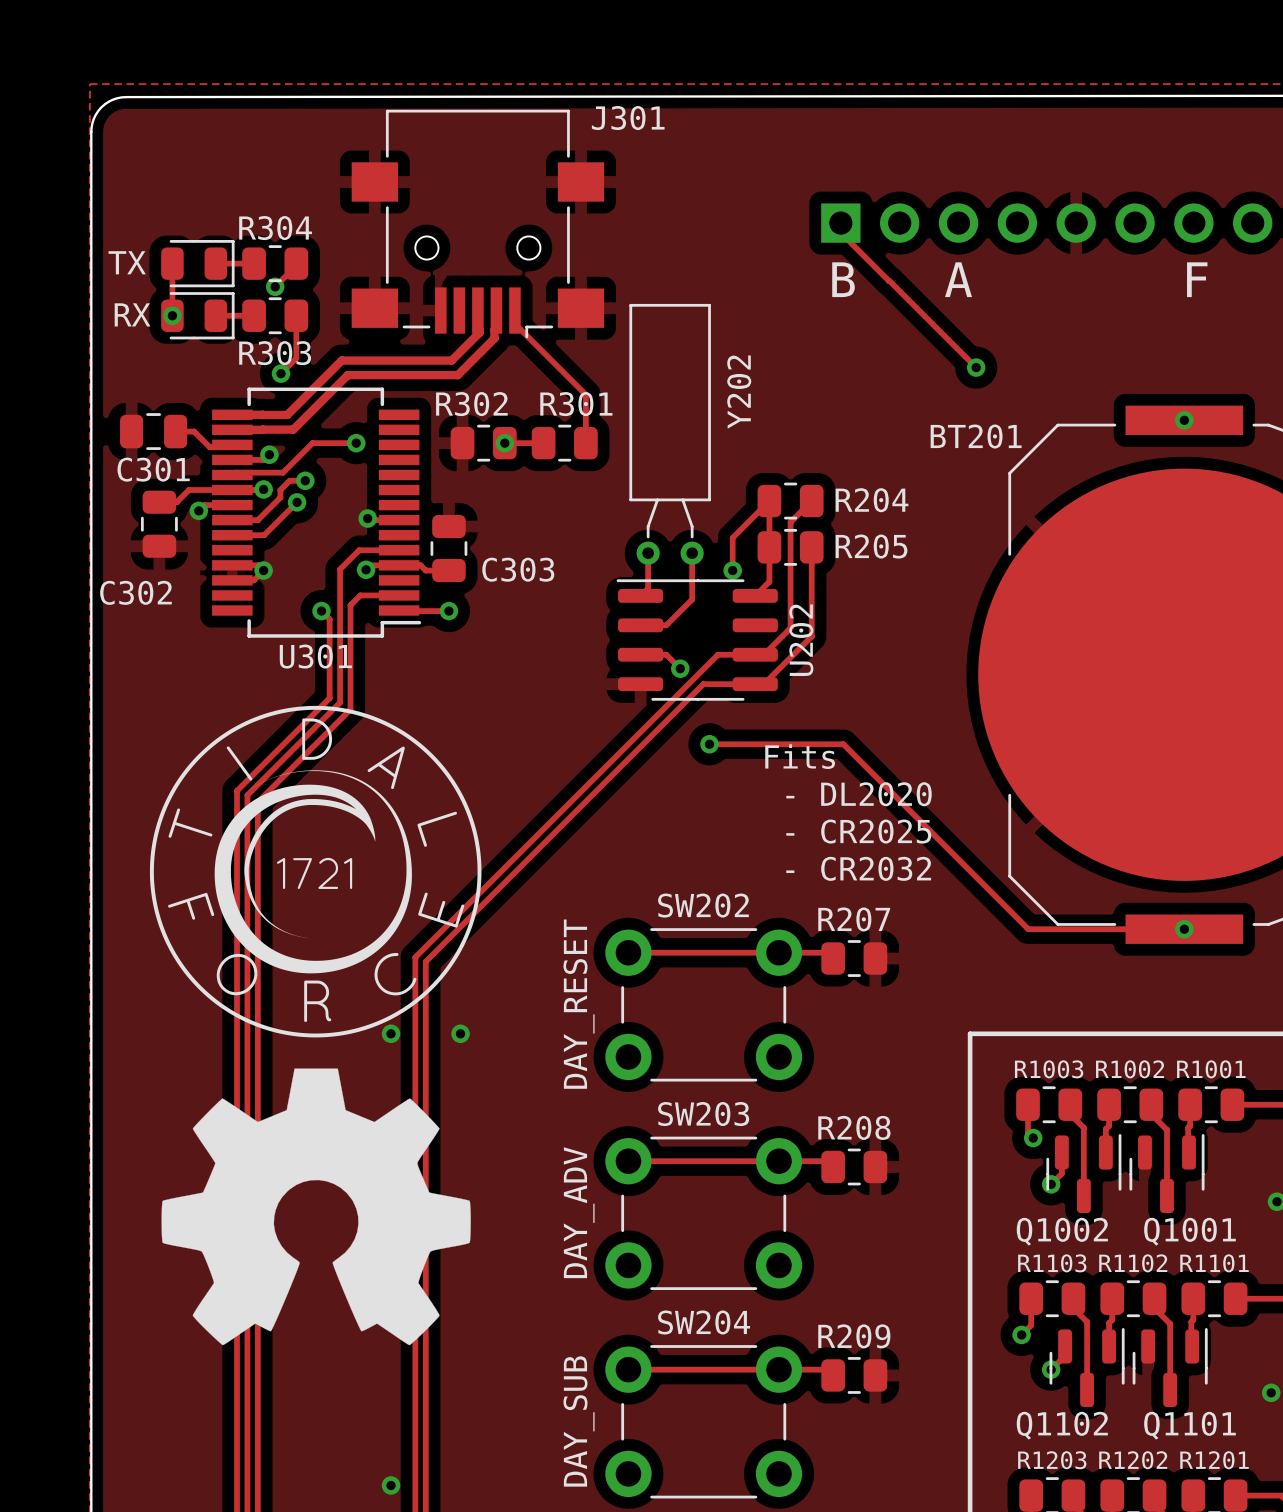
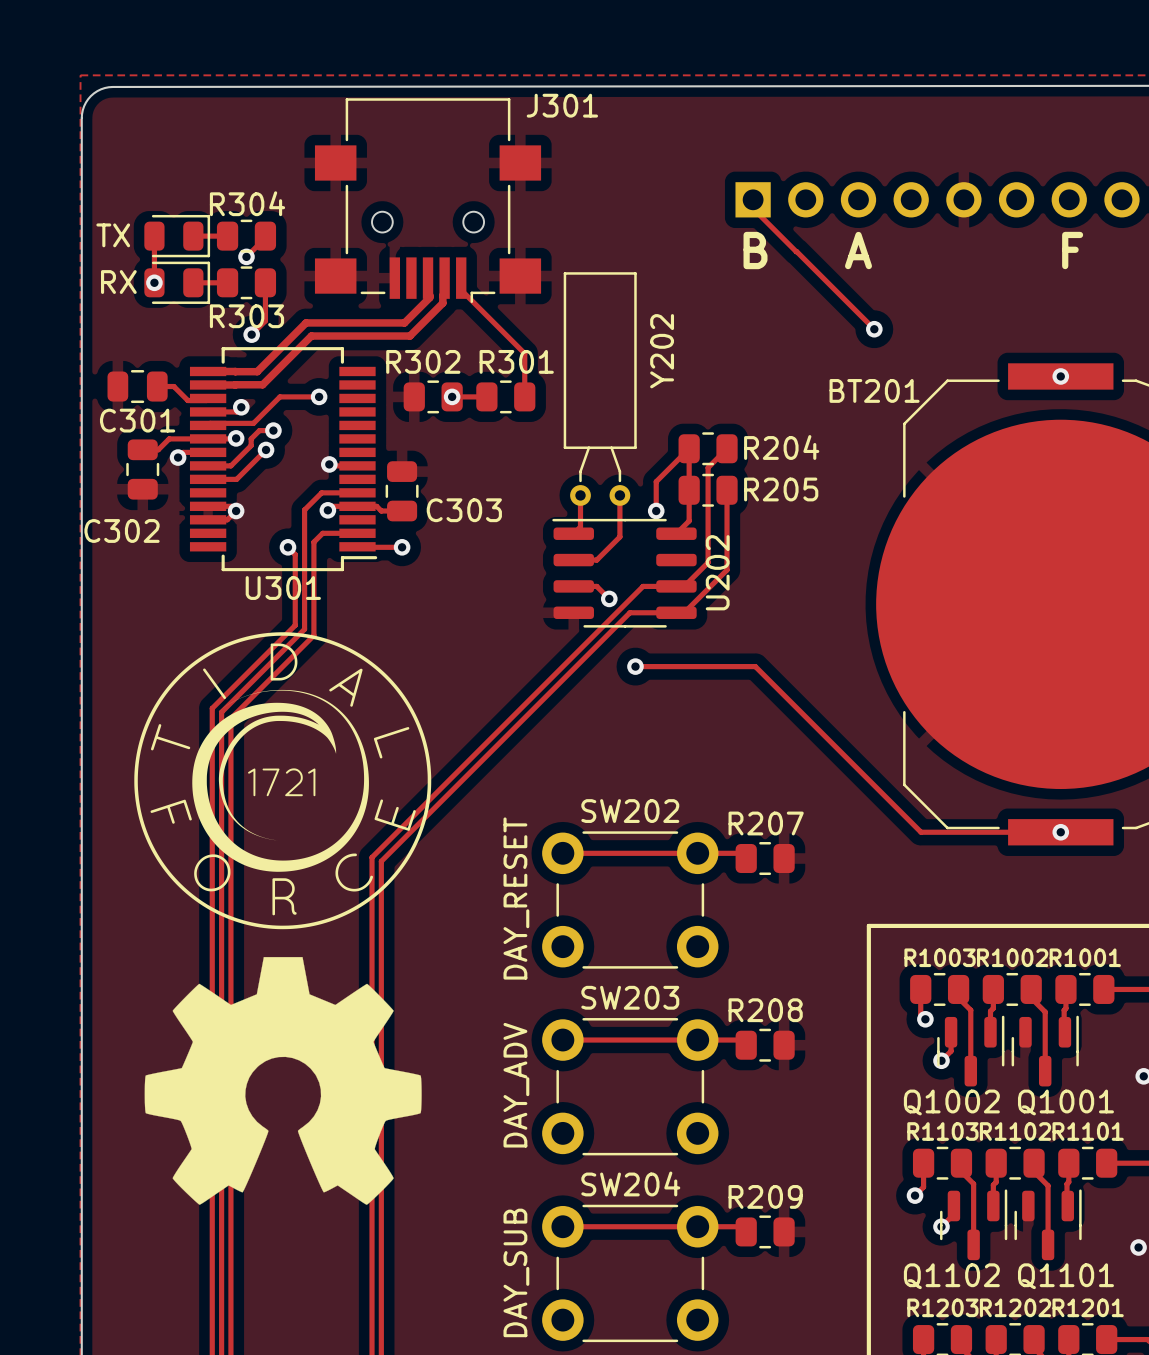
text: Fits (800, 756) -> none
text: - DL2020 (859, 794) -> none
text: - CR2025 (858, 831) -> none
text: - CR2032 (858, 868) -> none
via: (391, 1033) -> none
via: (460, 1033) -> none
via: (391, 1485) -> none

